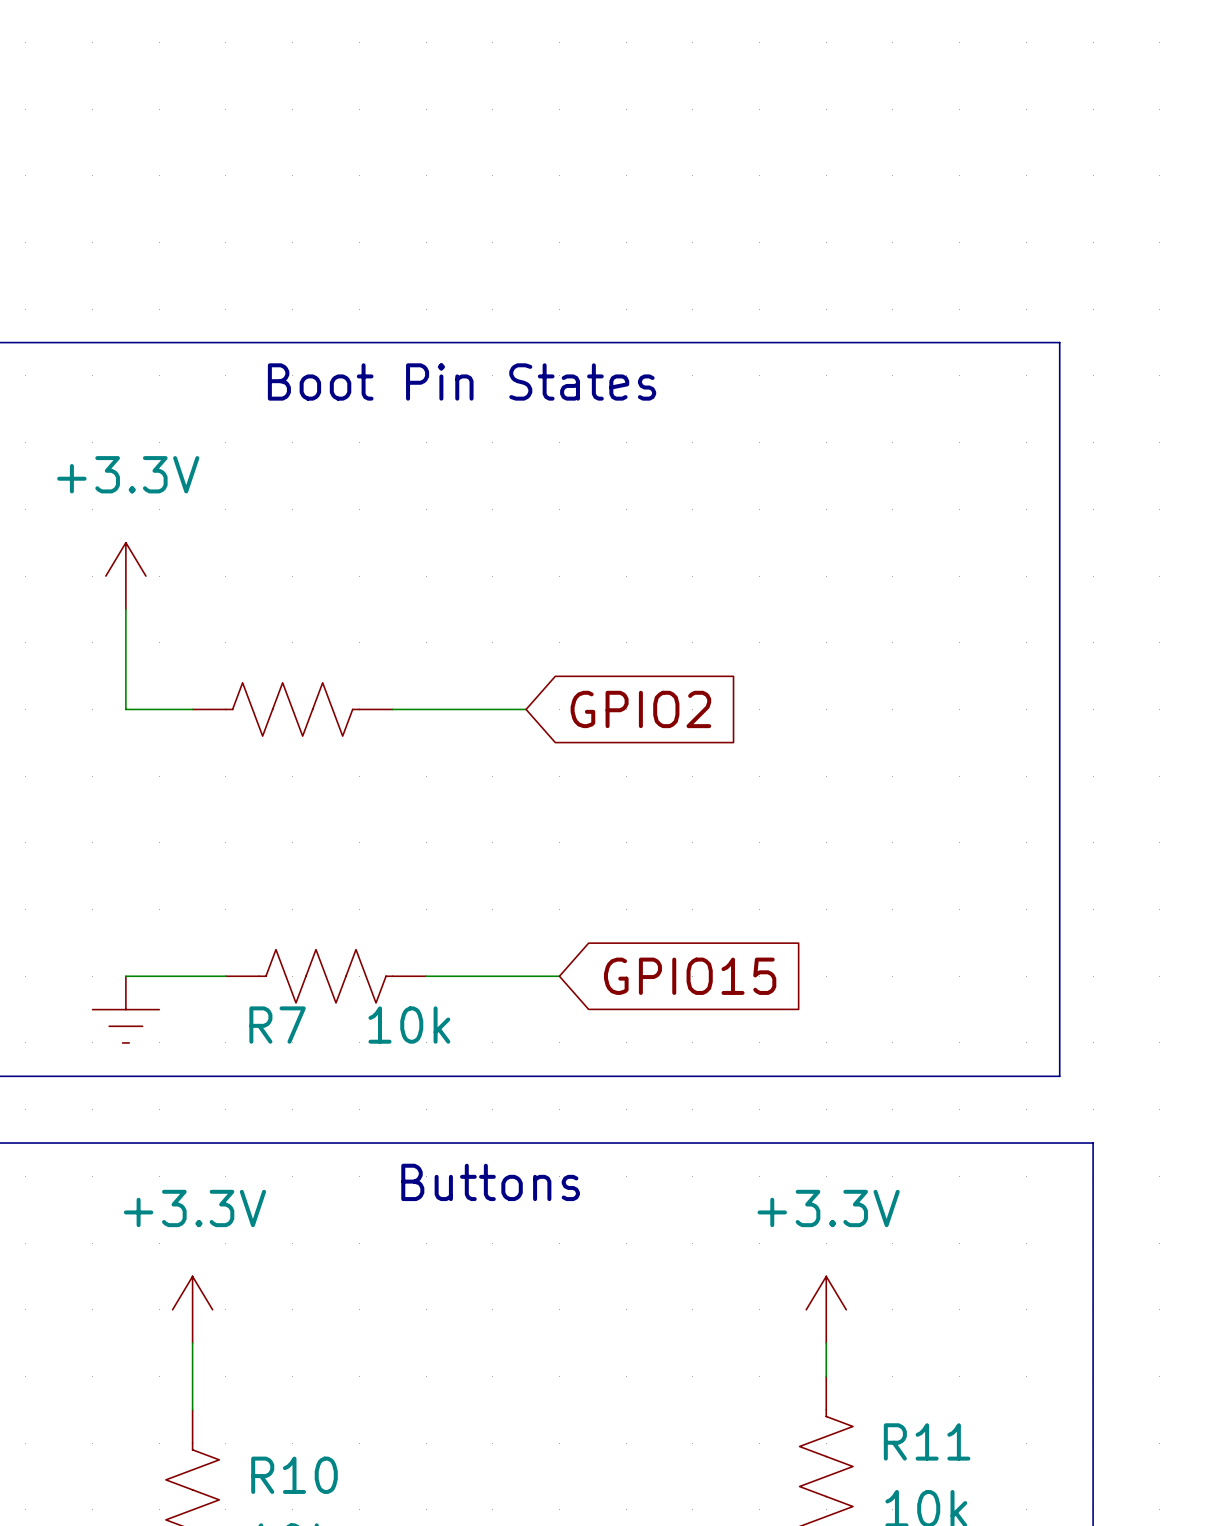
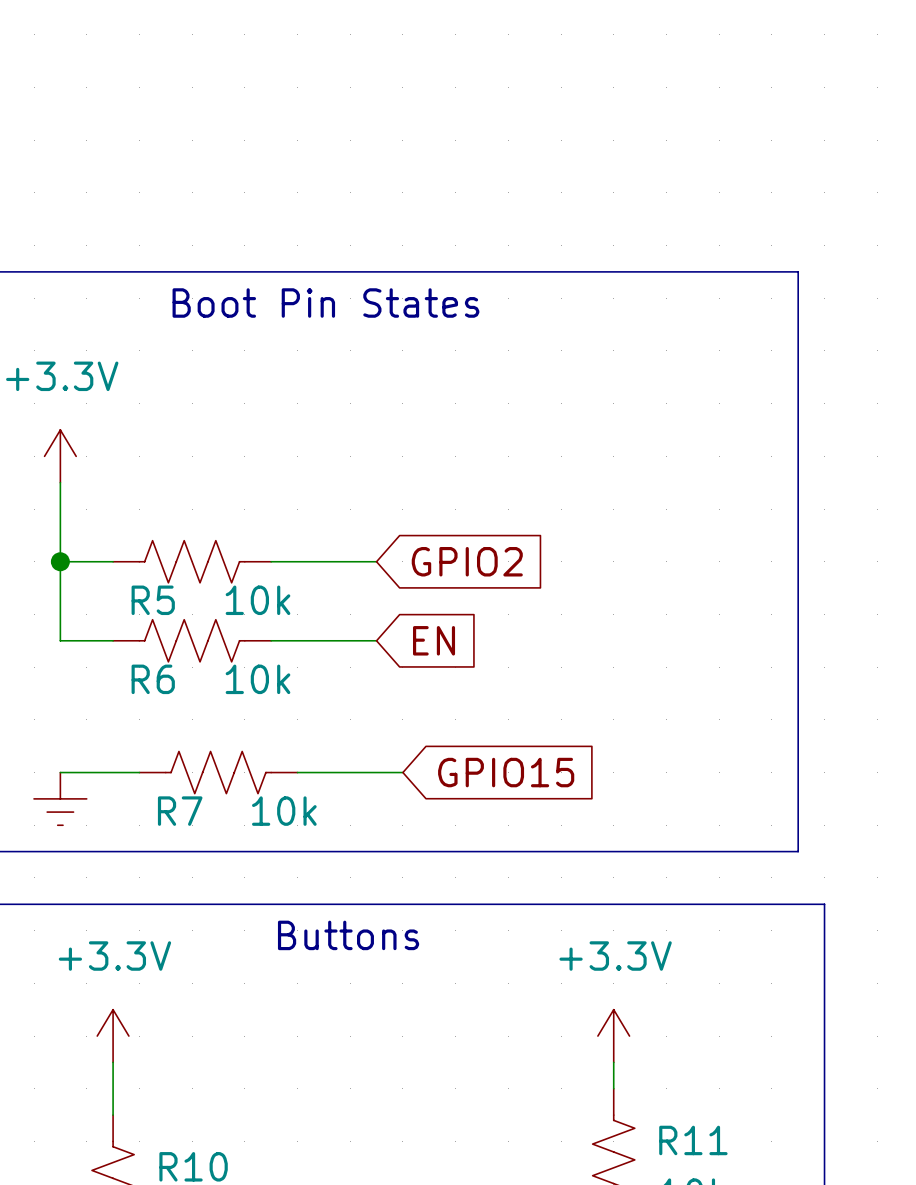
wire: none -> (60, 561) (60, 640) (113, 640)
junction: none -> (60, 561)
R5 name: none -> R5 (153, 600)
R5 value: none -> 10k (257, 600)
R6: none -> 10k (192, 640)
wire: none -> (271, 640) (376, 640)
global label: none -> EN (434, 640)

